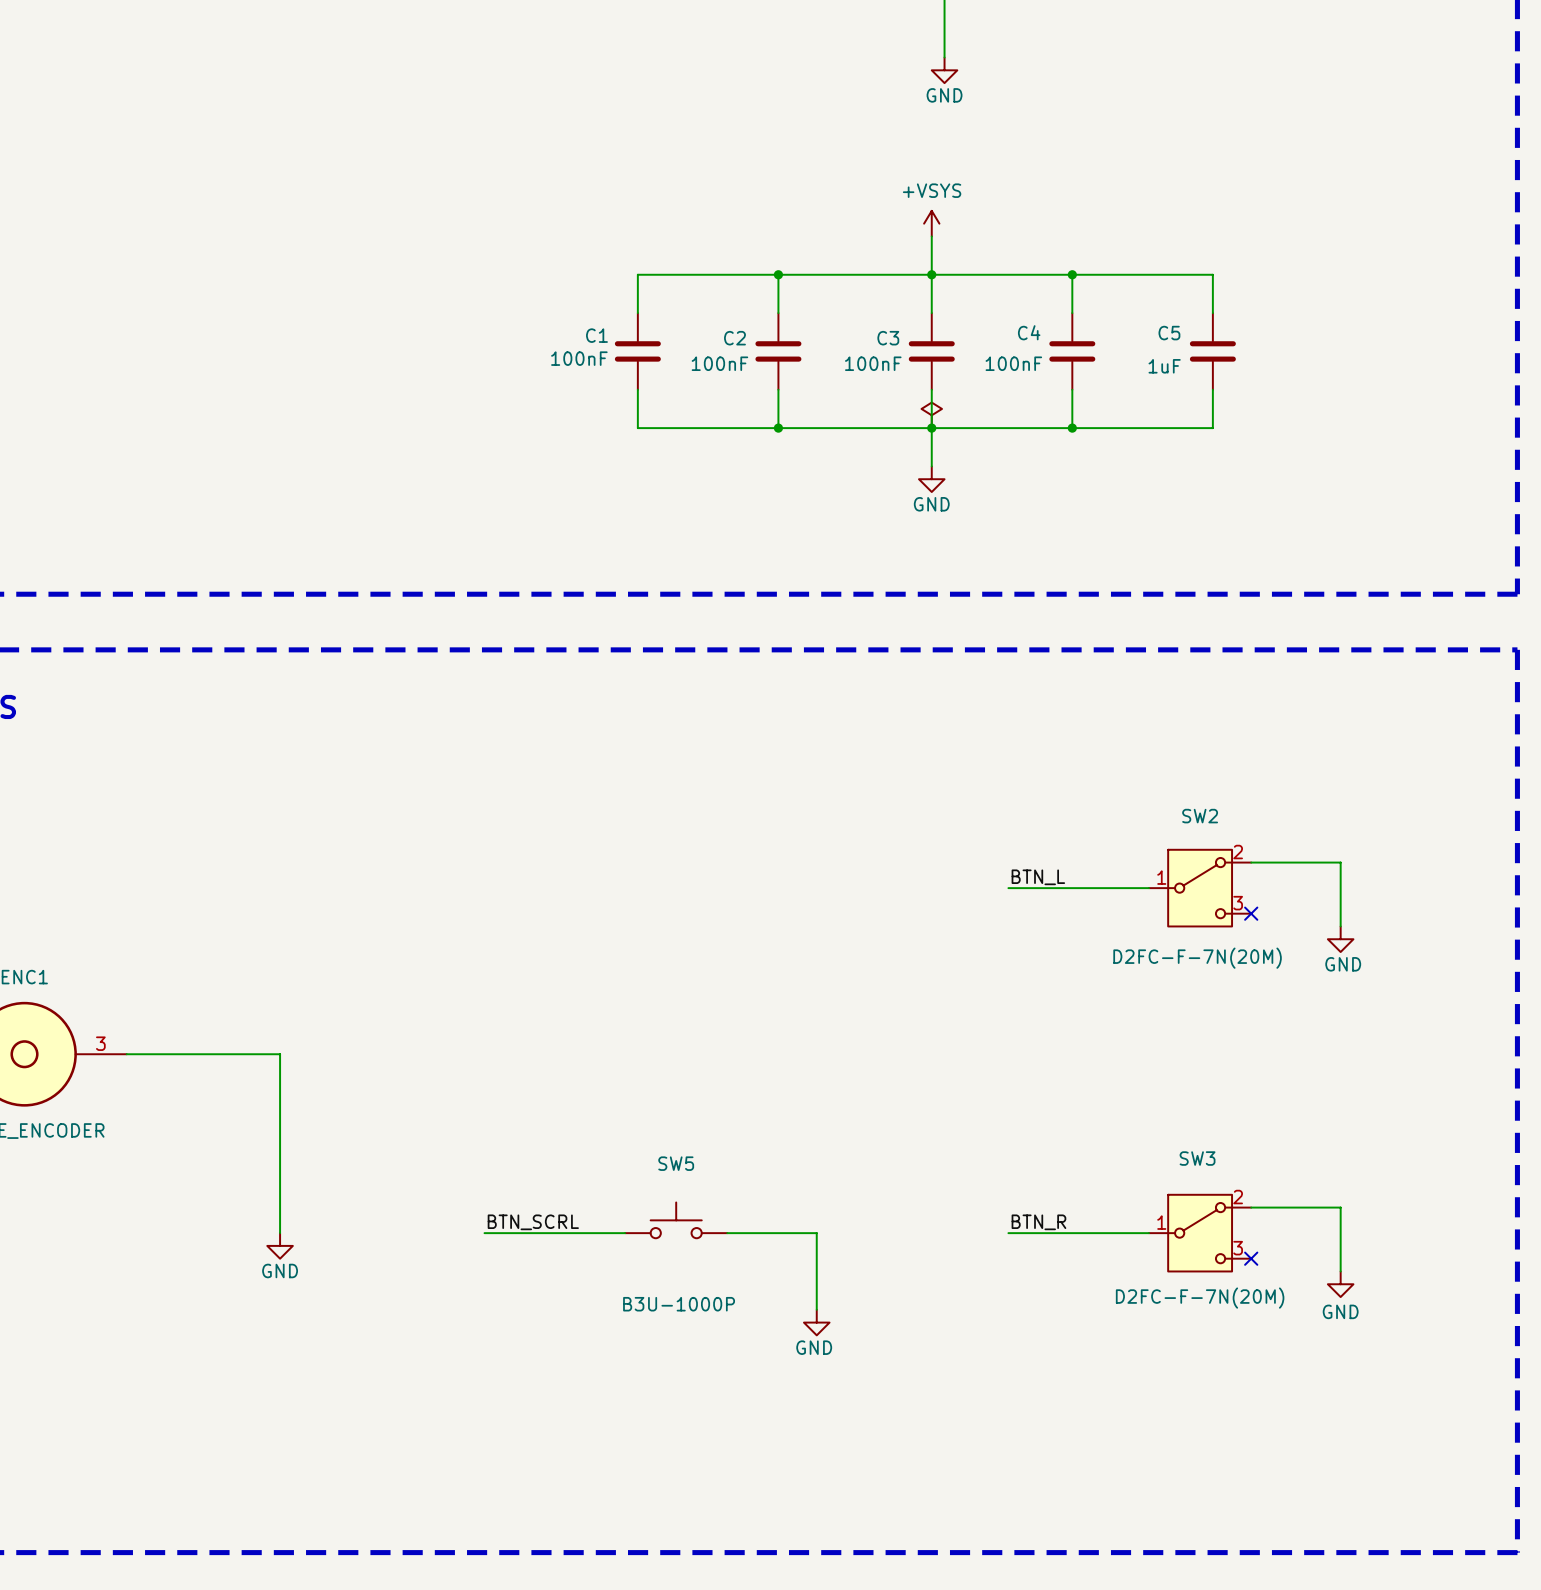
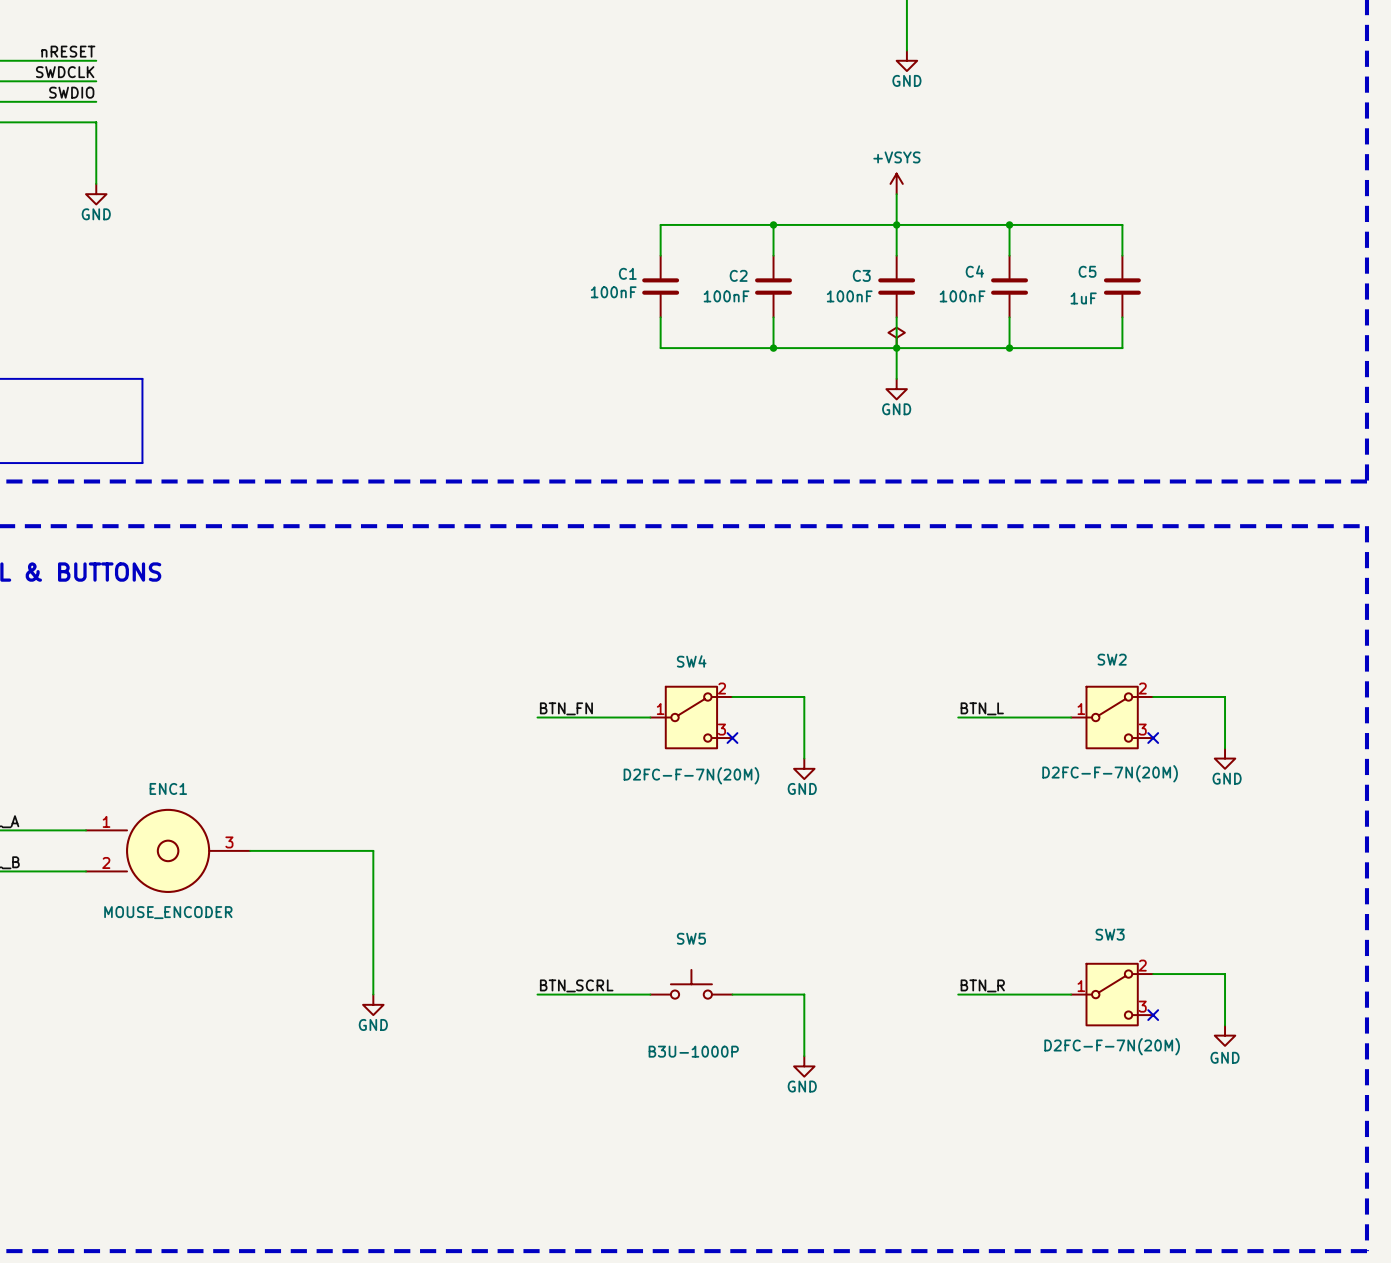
wire: none -> (732, 696) (804, 696) (804, 758)
label: none -> BTN_FN (566, 708)
wire: none -> (537, 717) (650, 717)
SW4: none -> D2FC-F-7N(20M) (691, 717)
no-connect mark: none -> (732, 738)
power symbol: none -> GND (804, 768)

